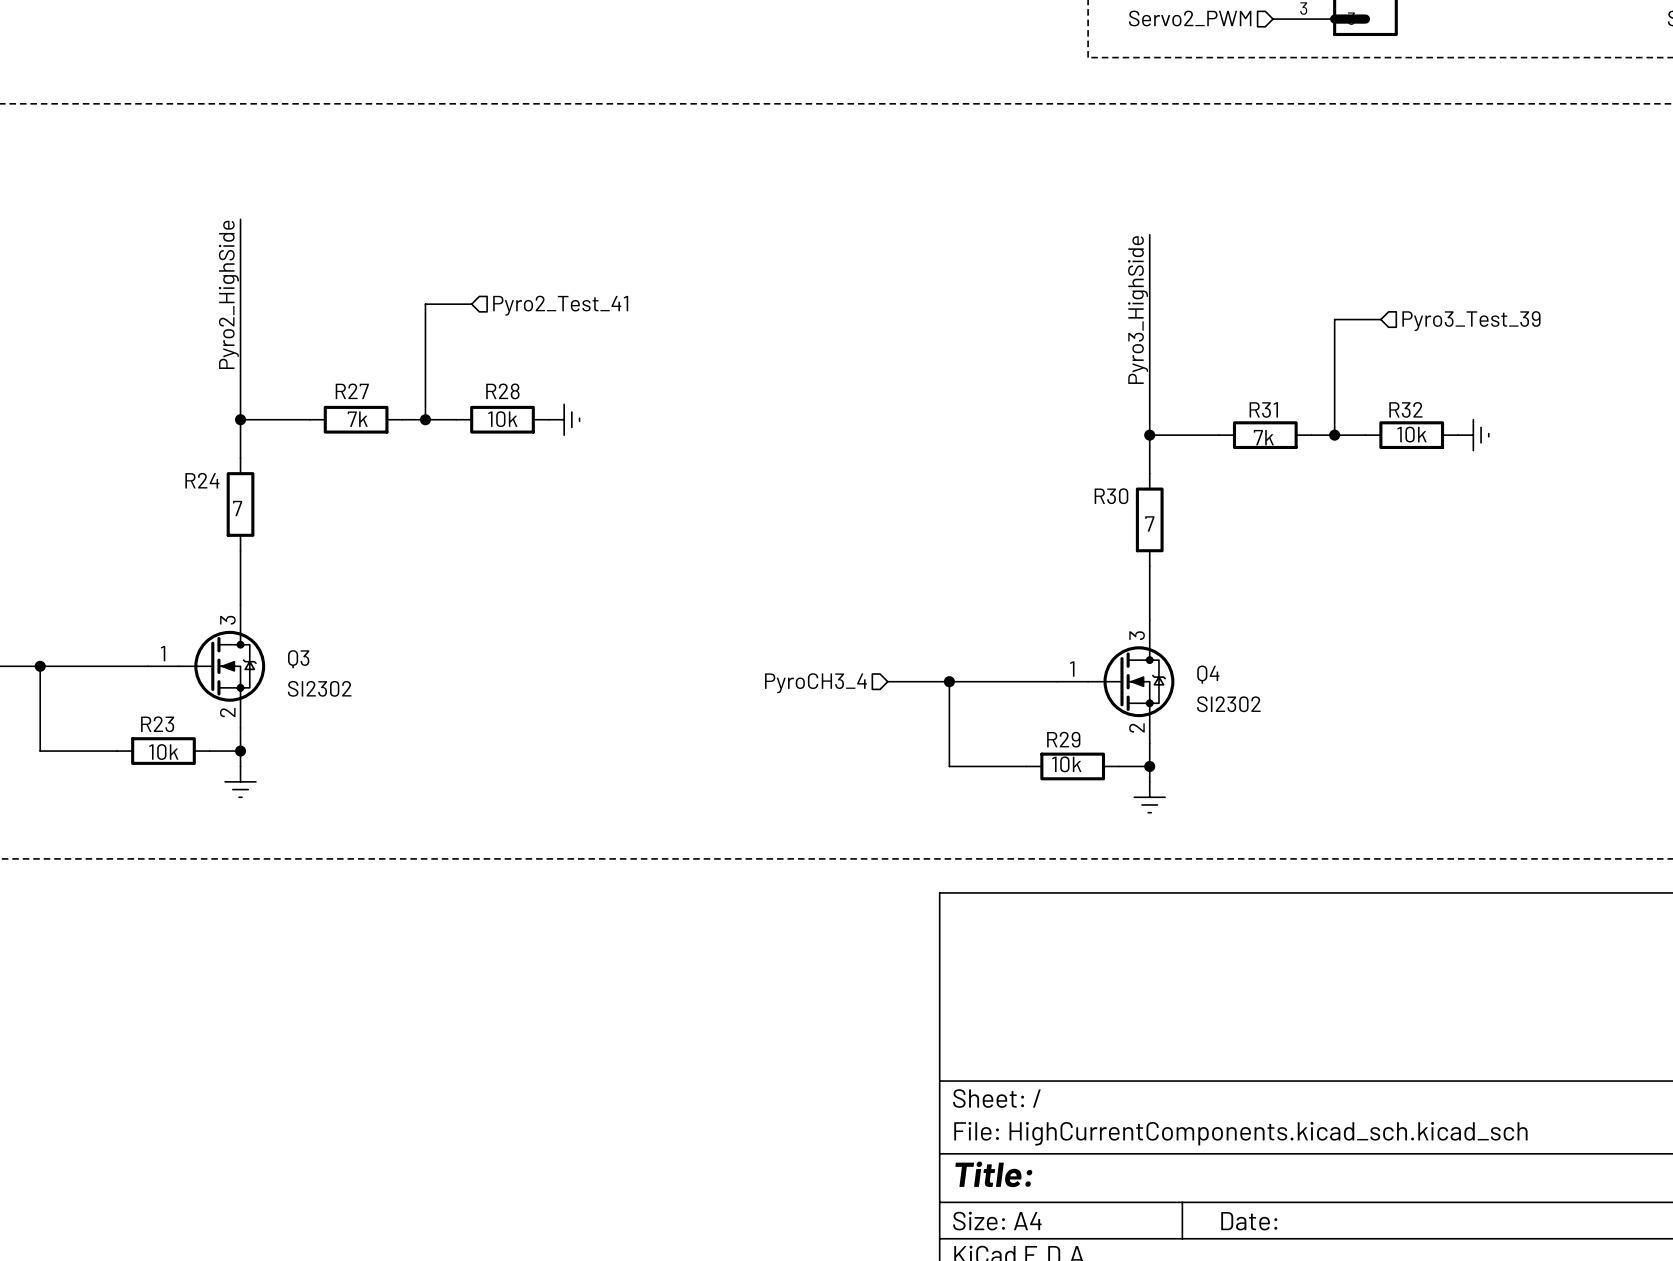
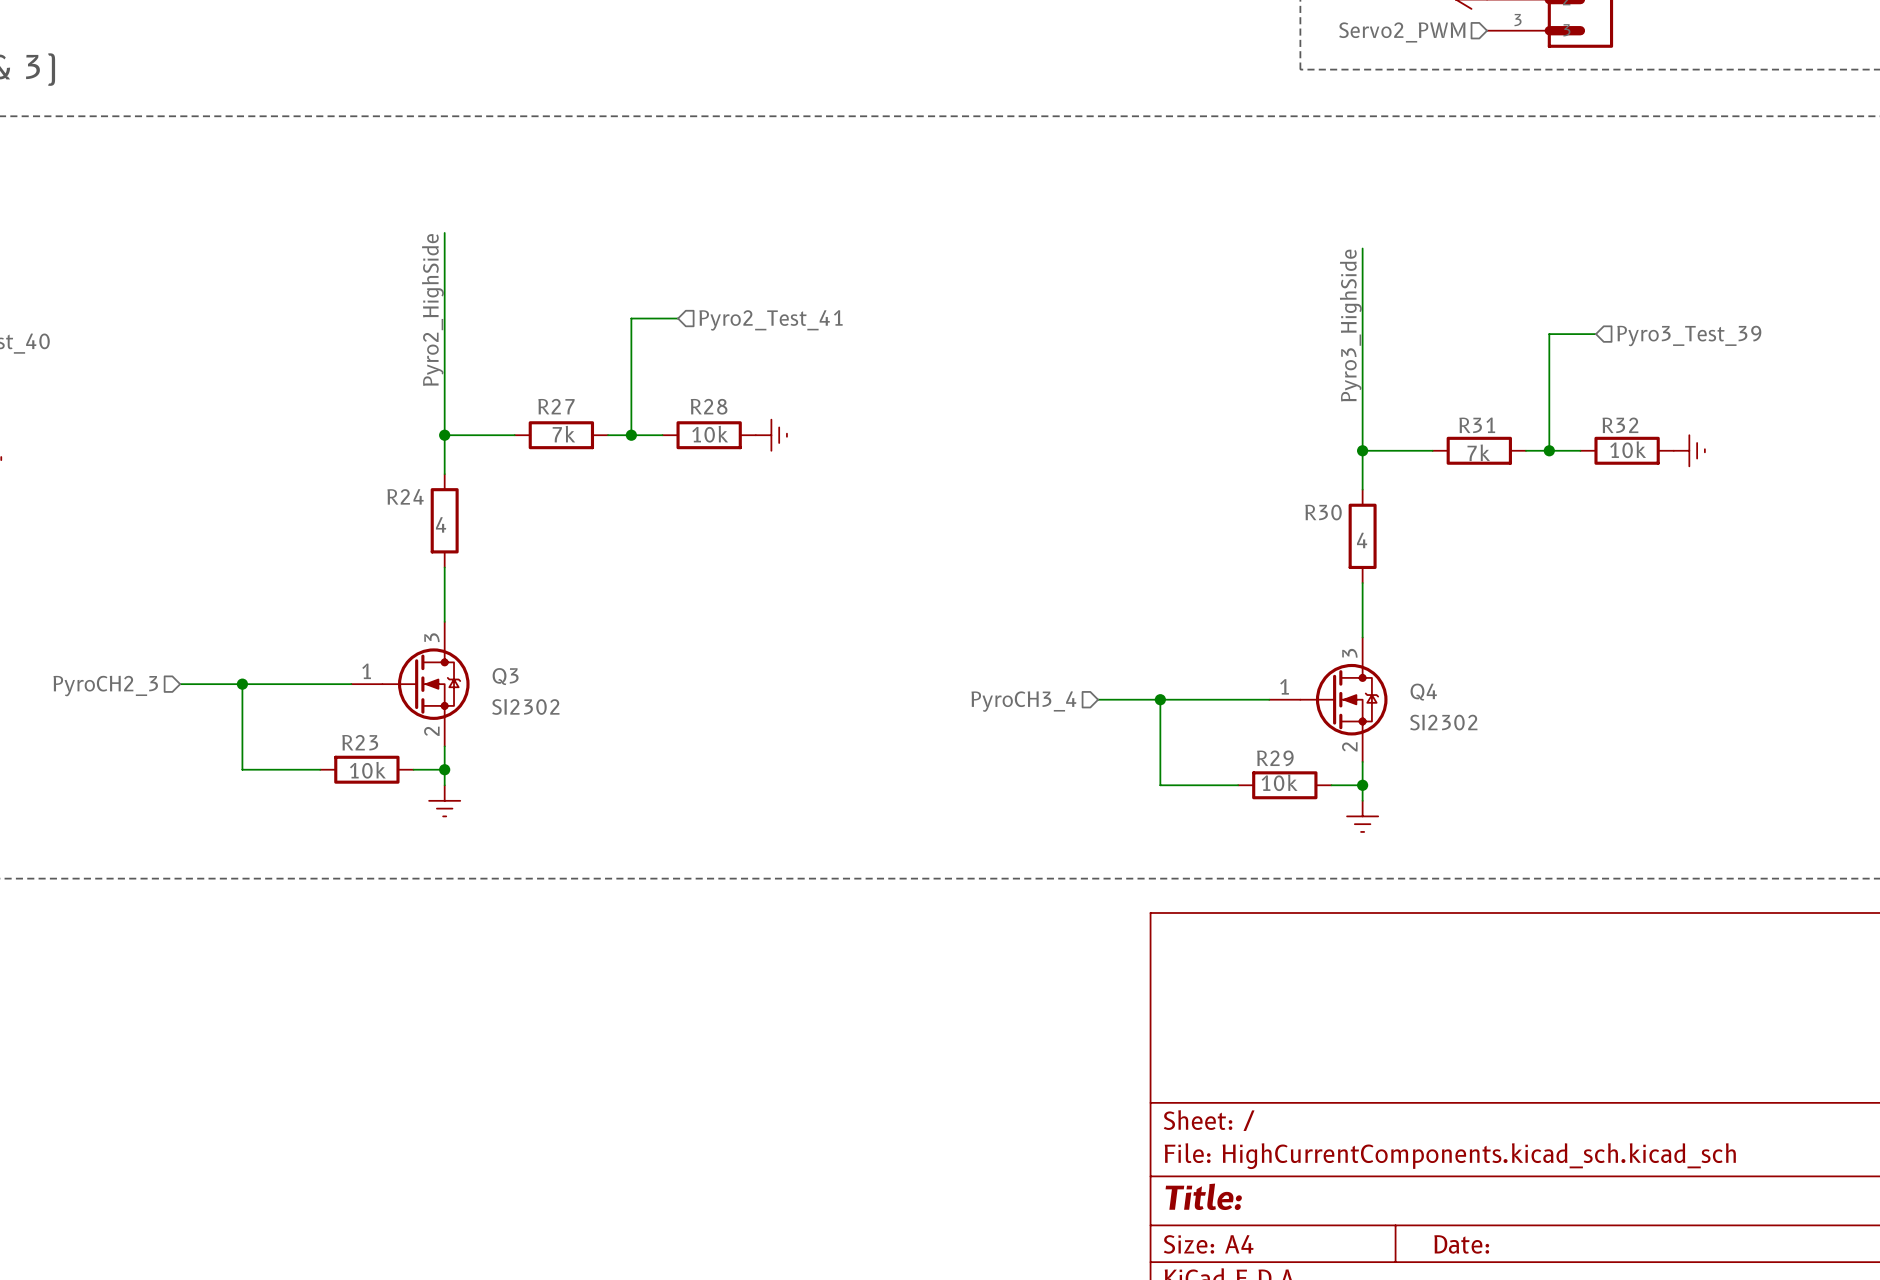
R24 value: 7 (237, 508) -> 4 (441, 524)
R30 value: 7 (1149, 523) -> 4 (1362, 540)

